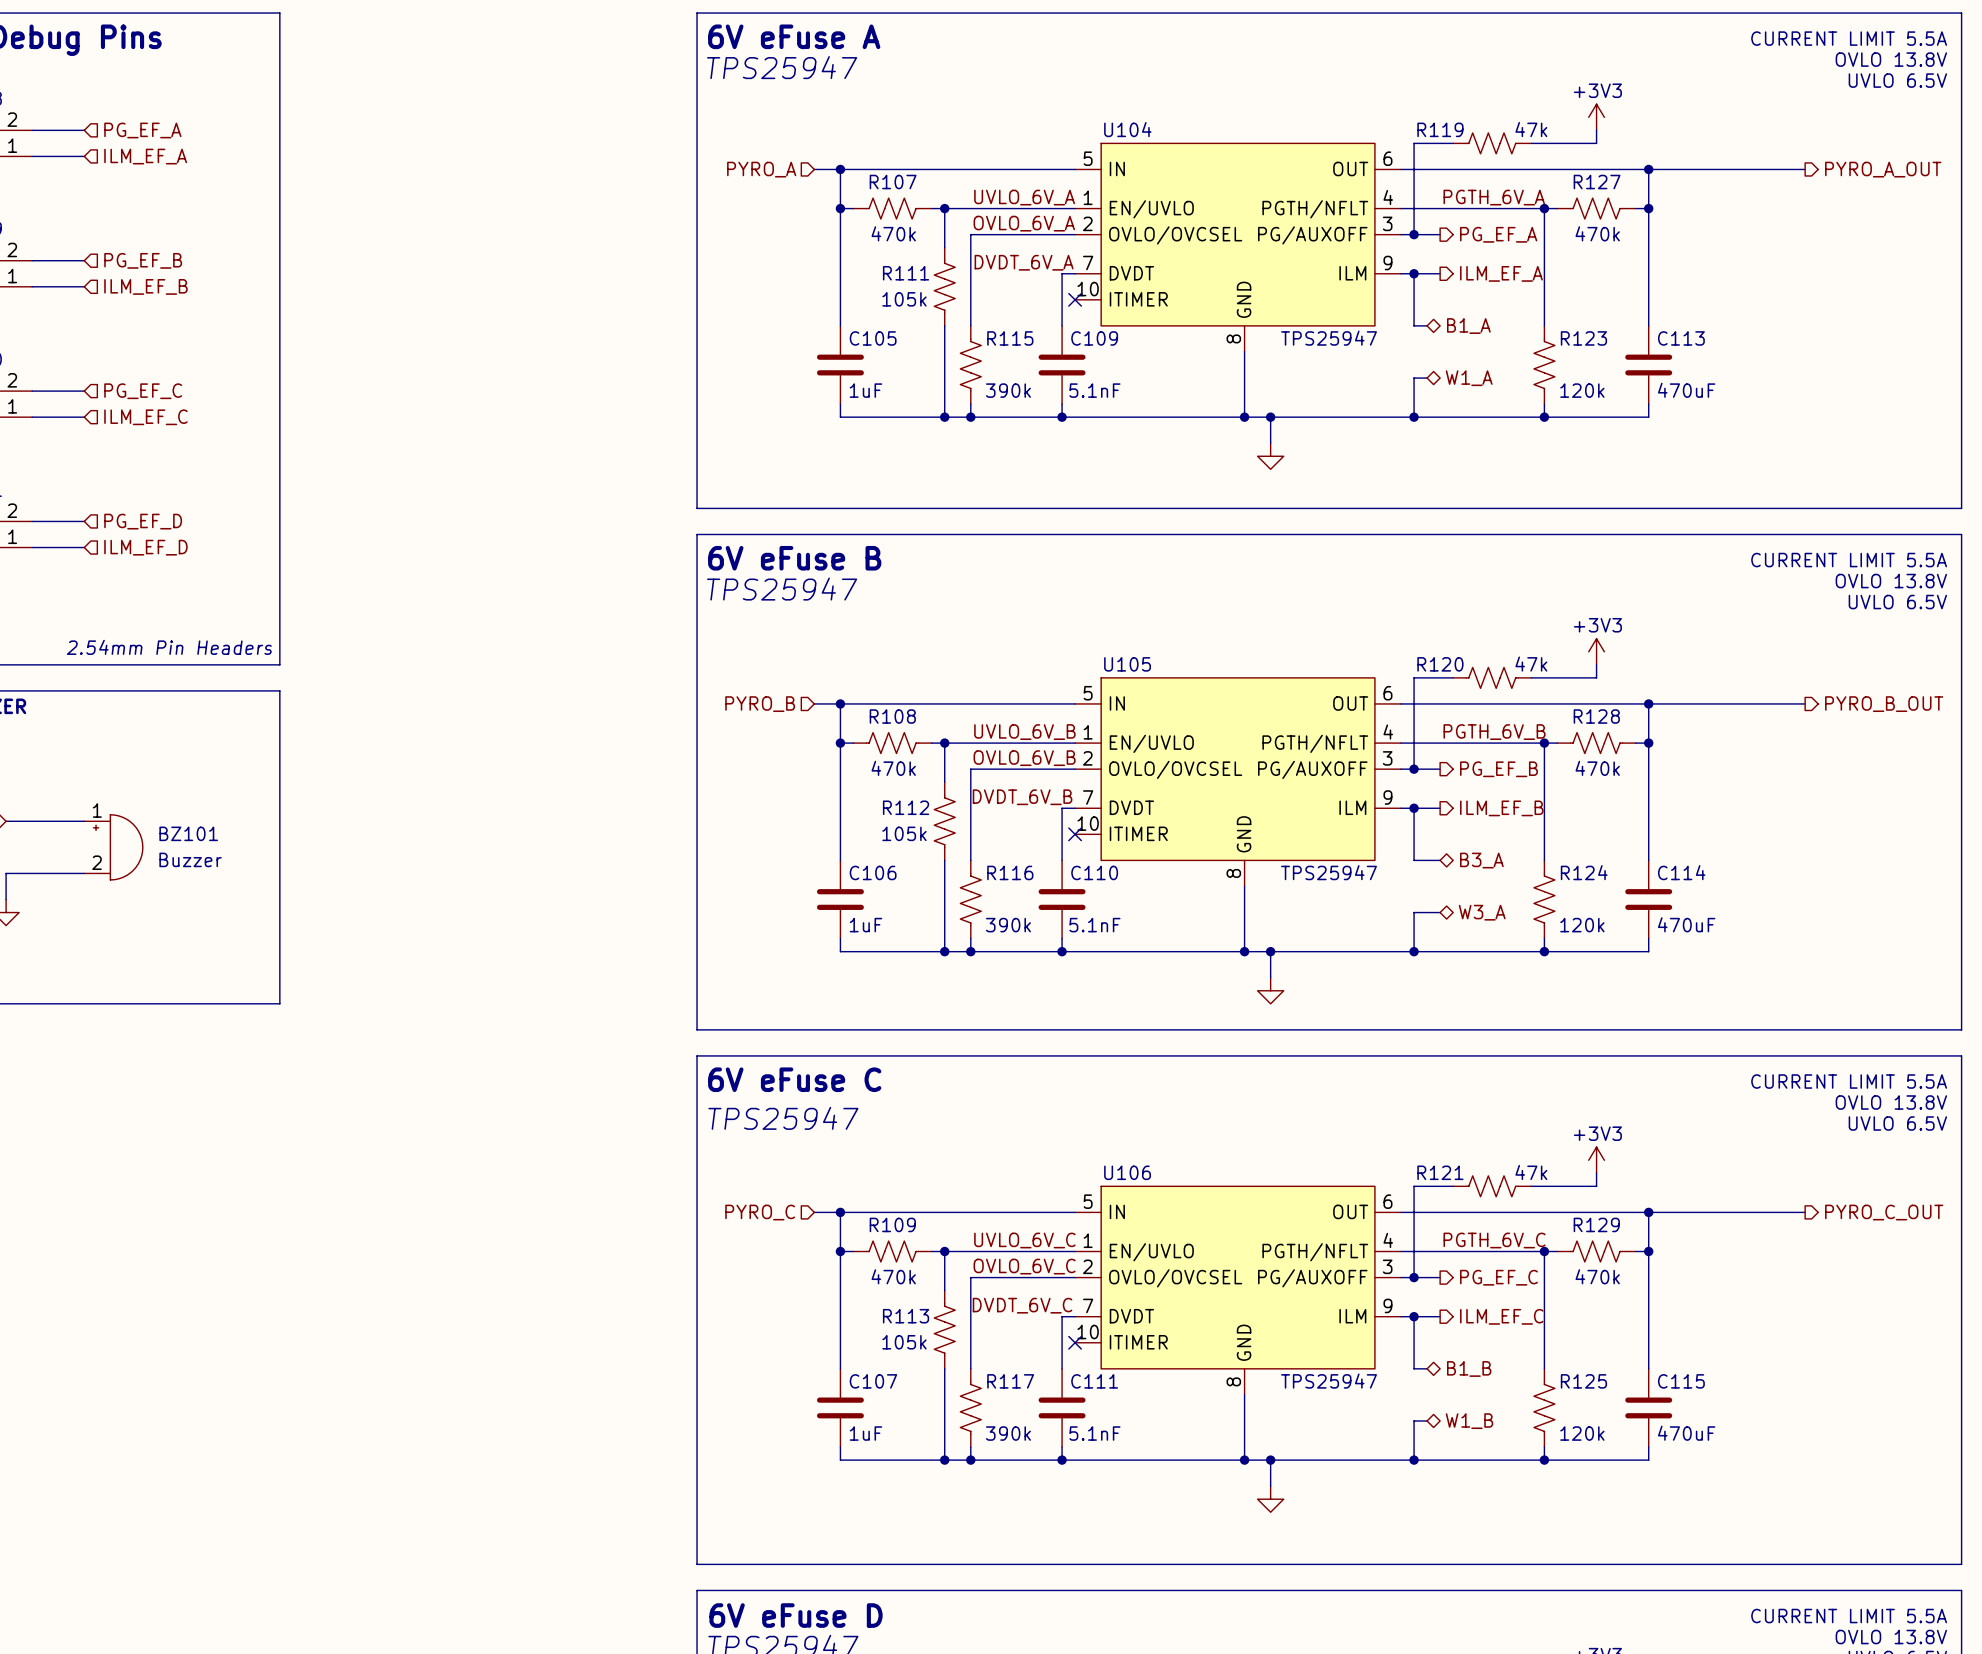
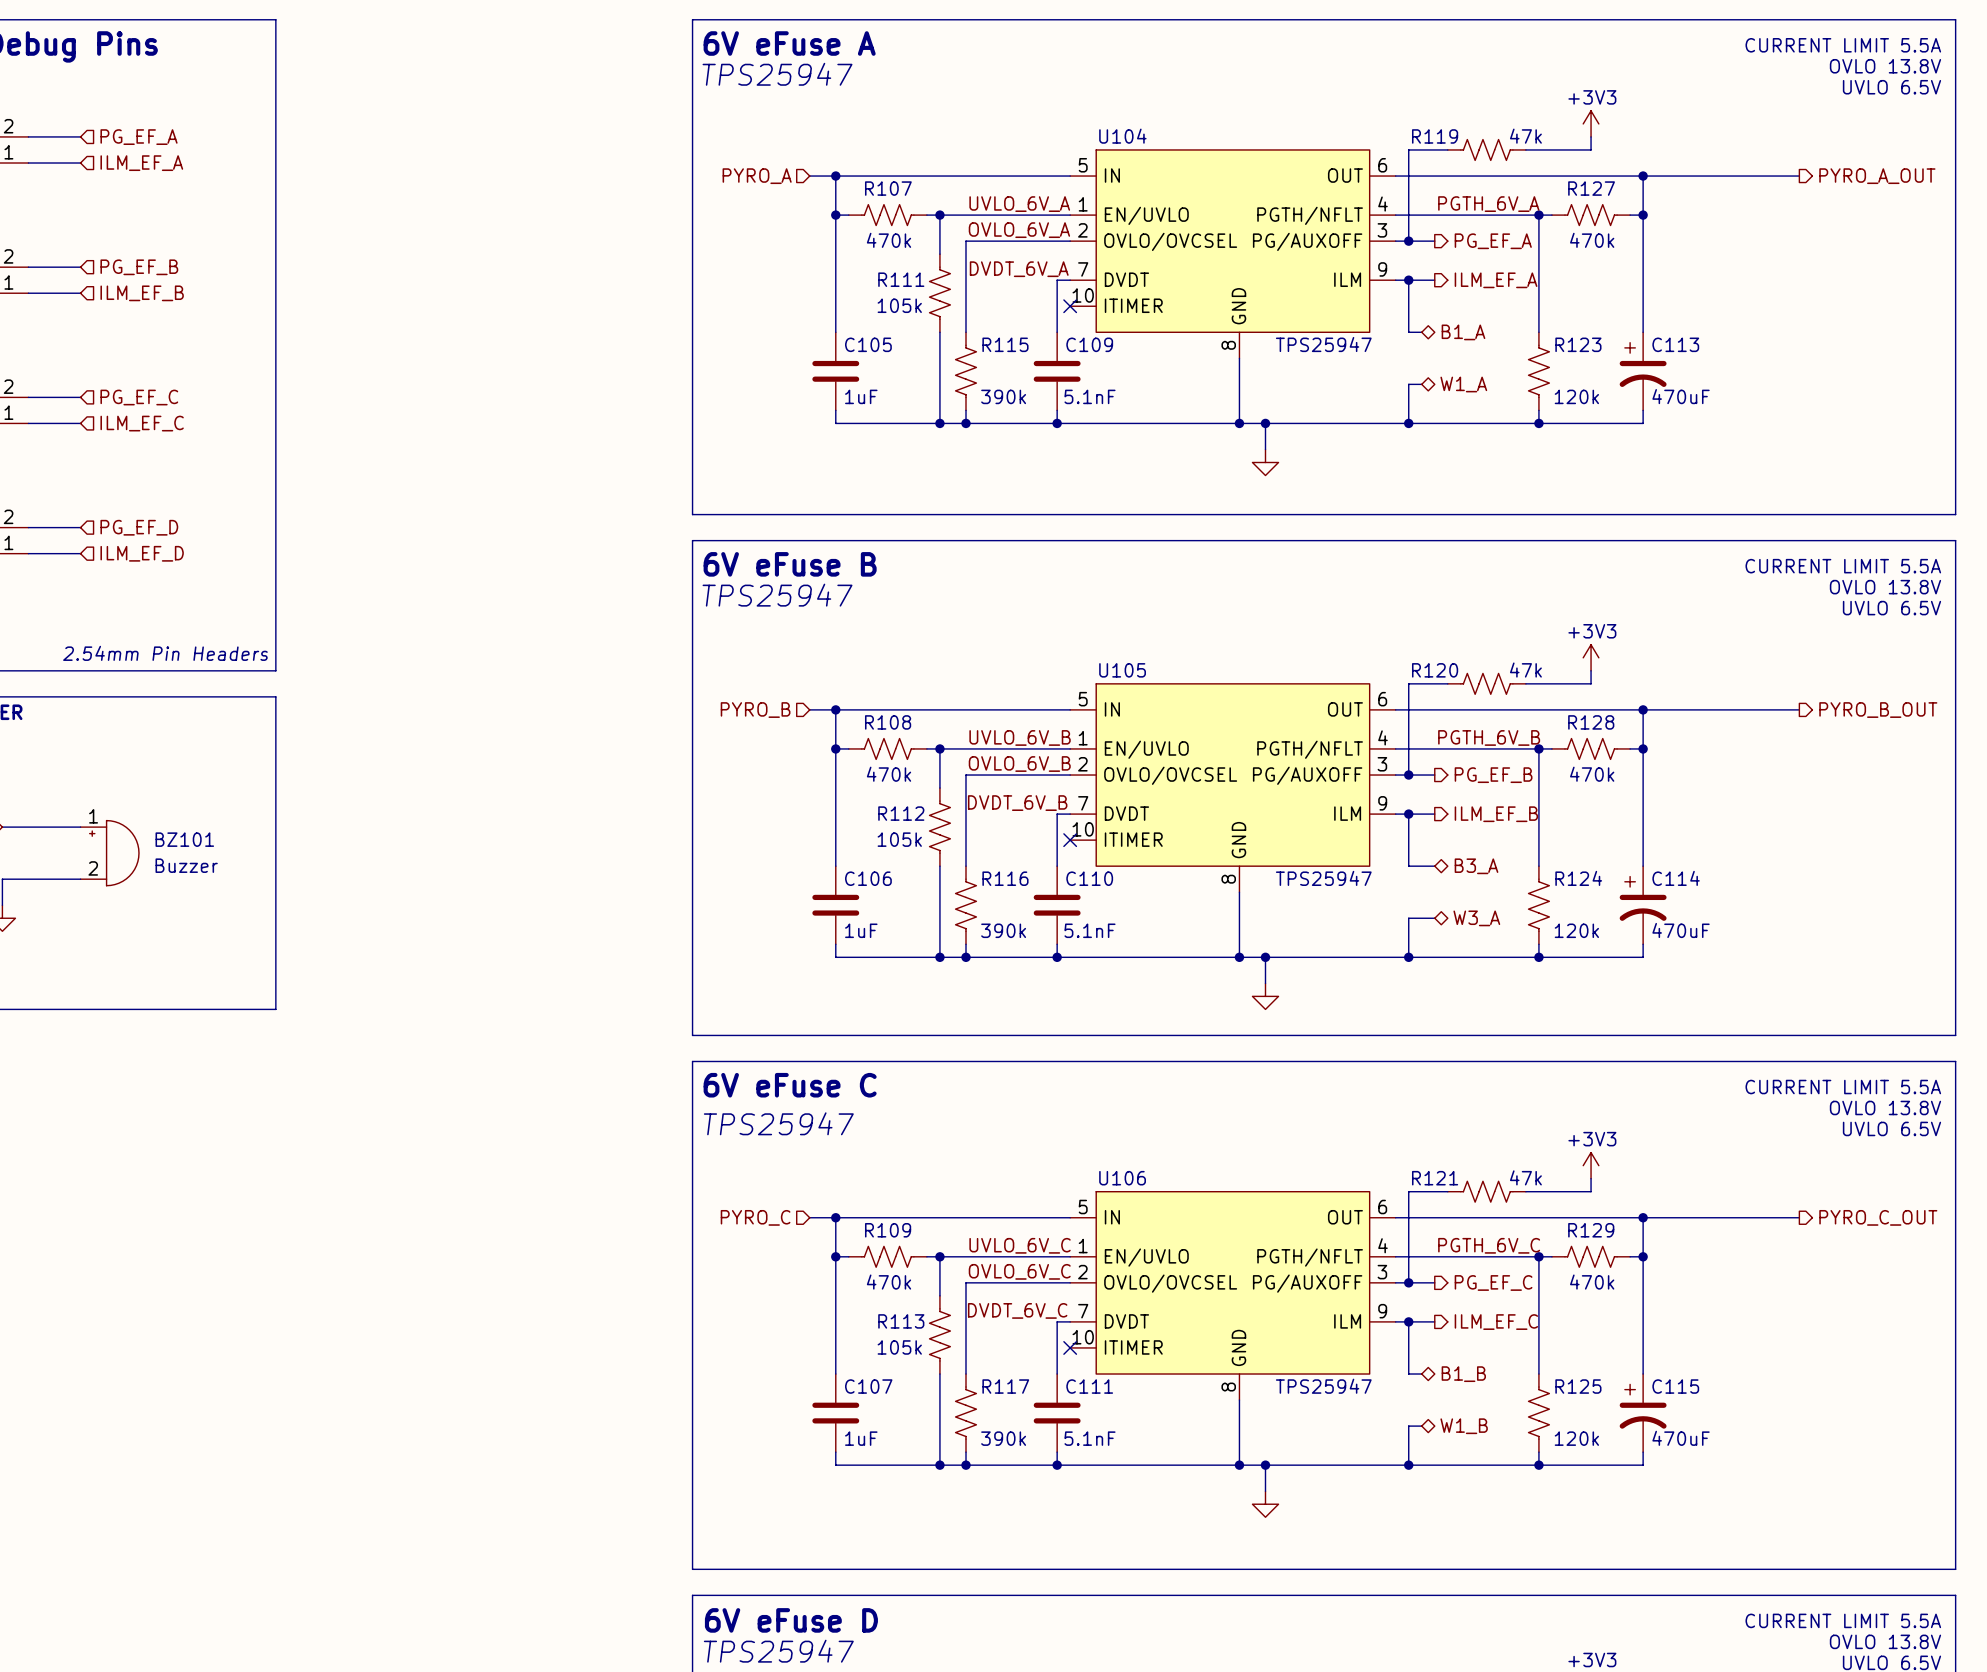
C113 symbol: [1625, 325, 1673, 405] -> [1619, 332, 1667, 411]
C114 symbol: [1625, 860, 1673, 939] -> [1619, 866, 1667, 945]
C115 symbol: [1625, 1368, 1673, 1448] -> [1619, 1374, 1667, 1453]

